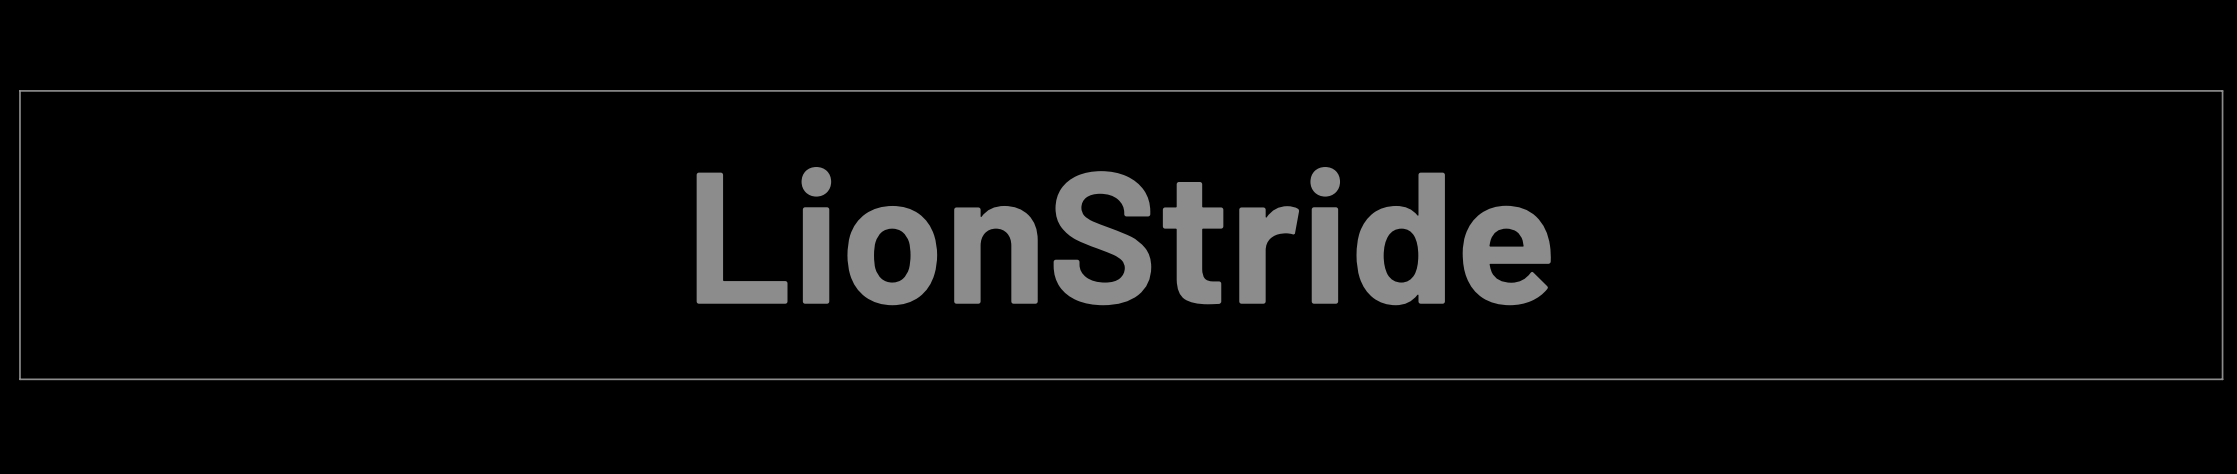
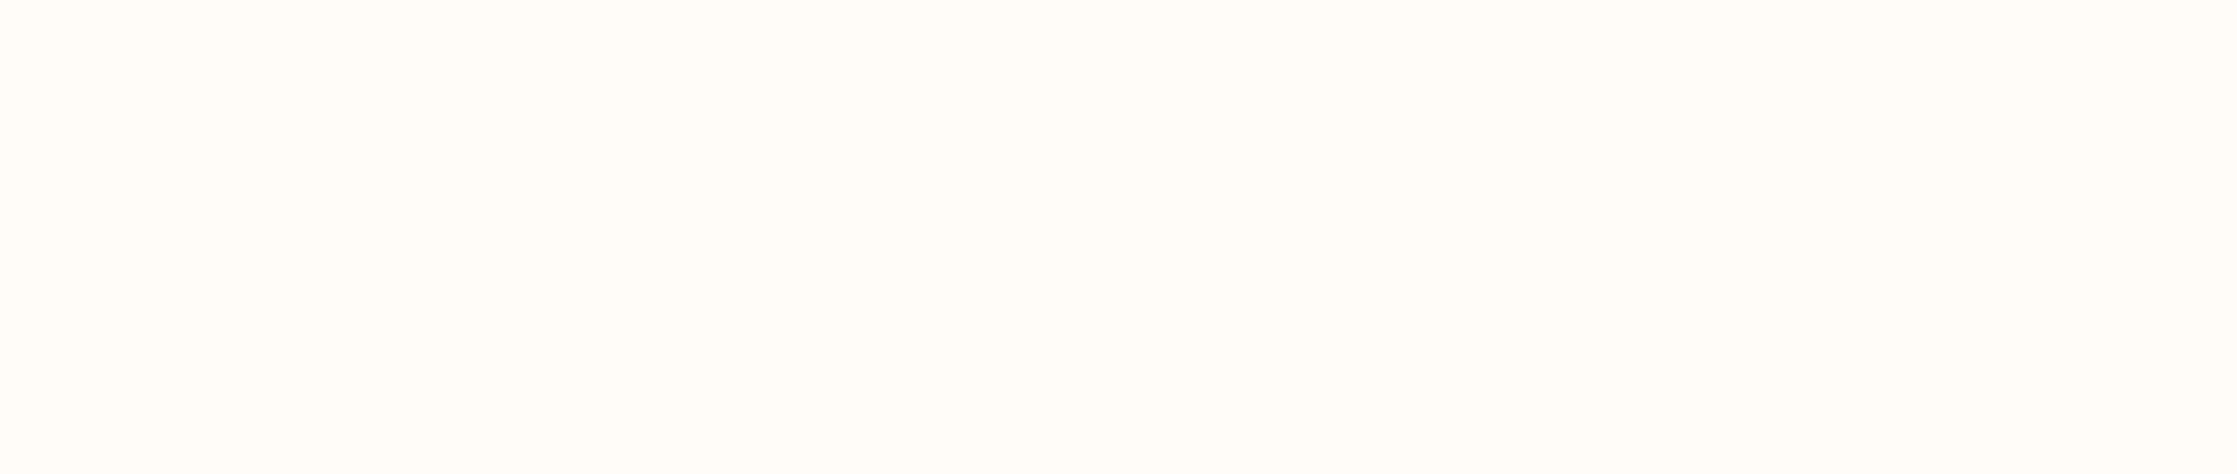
line: (19, 90) (2222, 90) (2222, 379) (19, 379) (19, 90) -> none
text: LionStride (1123, 236) -> none

